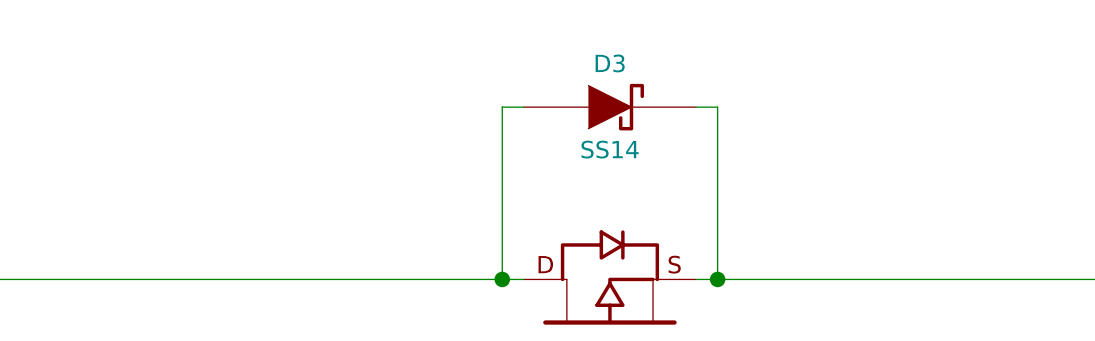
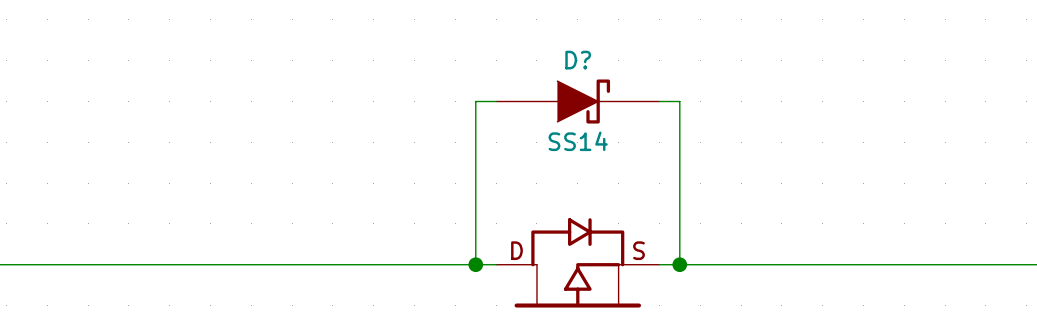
D3 name: D3 (610, 63) -> D? (578, 60)

